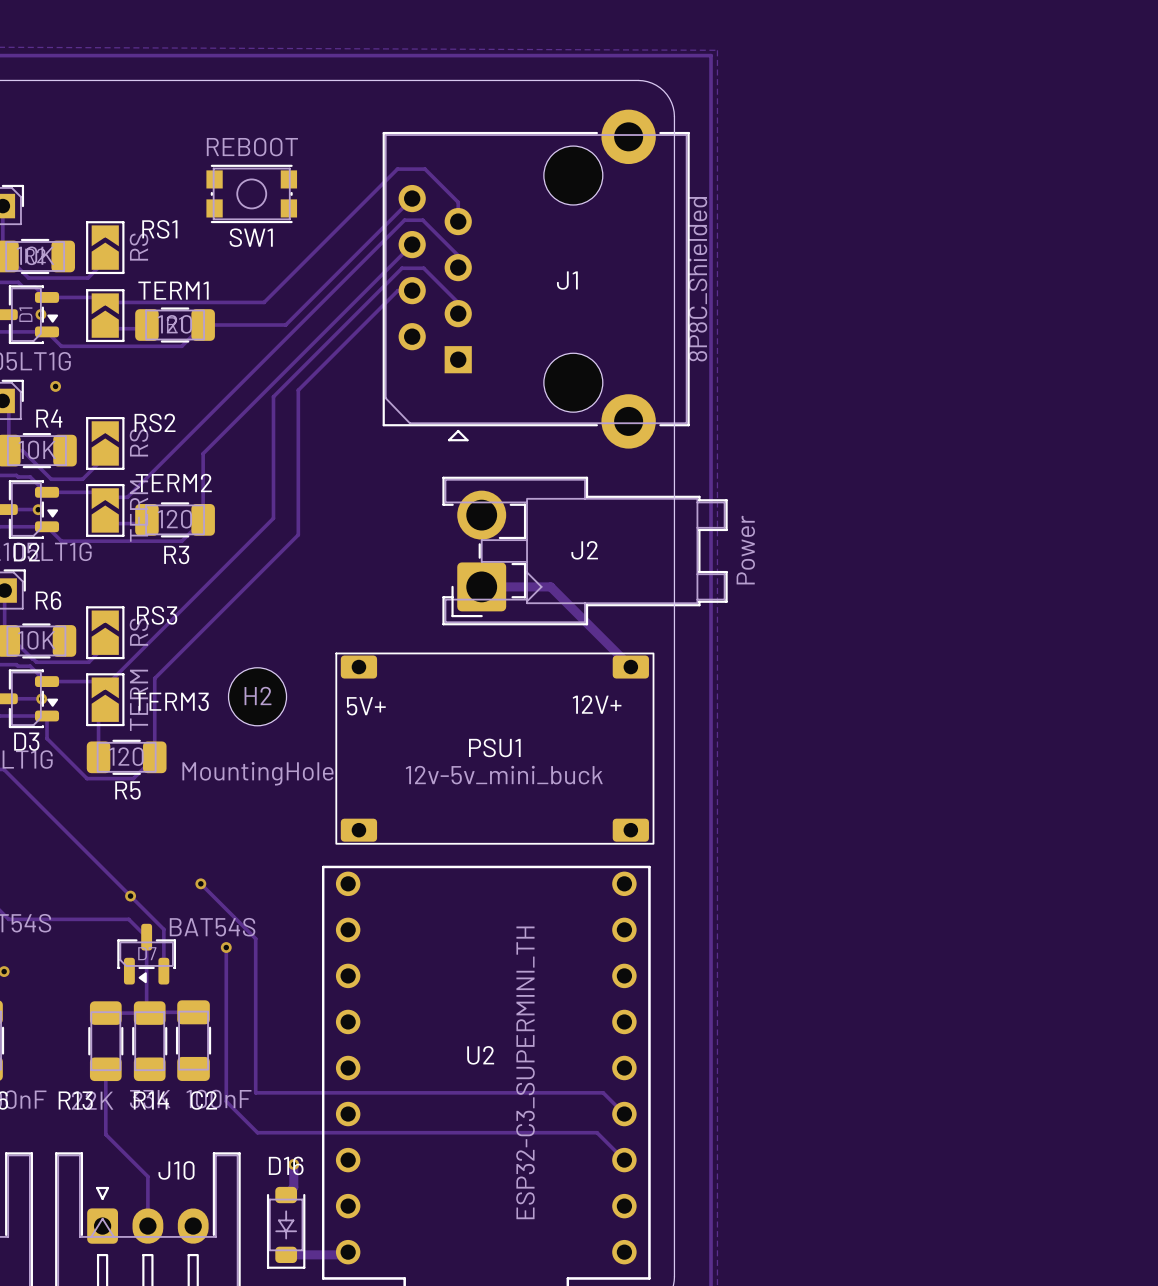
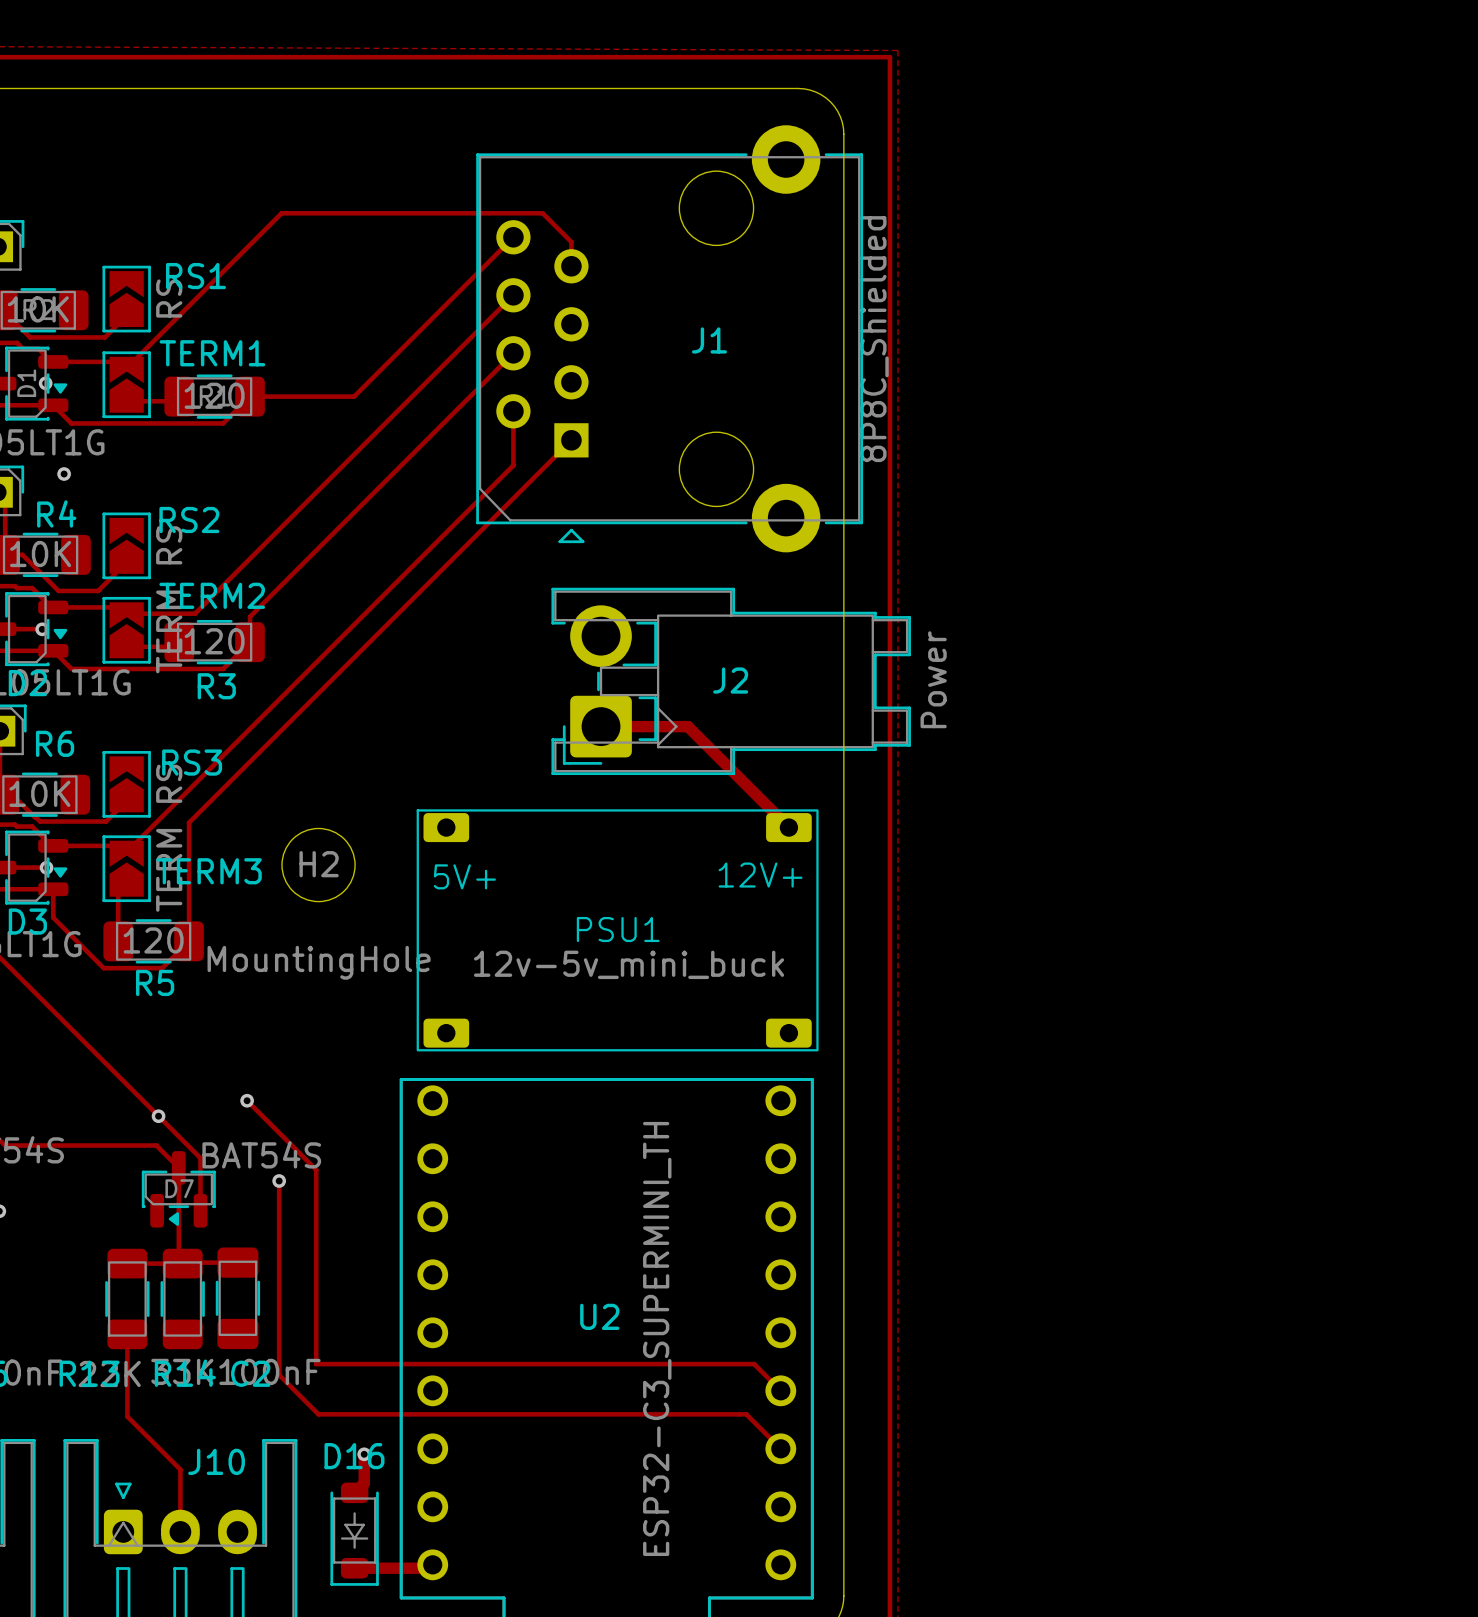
track: (435, 179) (424, 169) (397, 169) (264, 302) (105, 302) -> (542, 213) (281, 213) (126, 368)
SW1: REBOOT (251, 193) -> none
track: (458, 267) (458, 255) (422, 220) (404, 220) (127, 497) -> none
track: (412, 290) (397, 290) (298, 390) (298, 534) (154, 678) -> (571, 440) (189, 822) (189, 841)
track: none -> (513, 353) (250, 616)
track: (458, 313) (458, 302) (423, 268) (402, 268) (273, 396) (273, 518) -> (513, 411) (513, 465) (338, 640)
track: (203, 453) (203, 499) -> (250, 558) (195, 613) (154, 613)

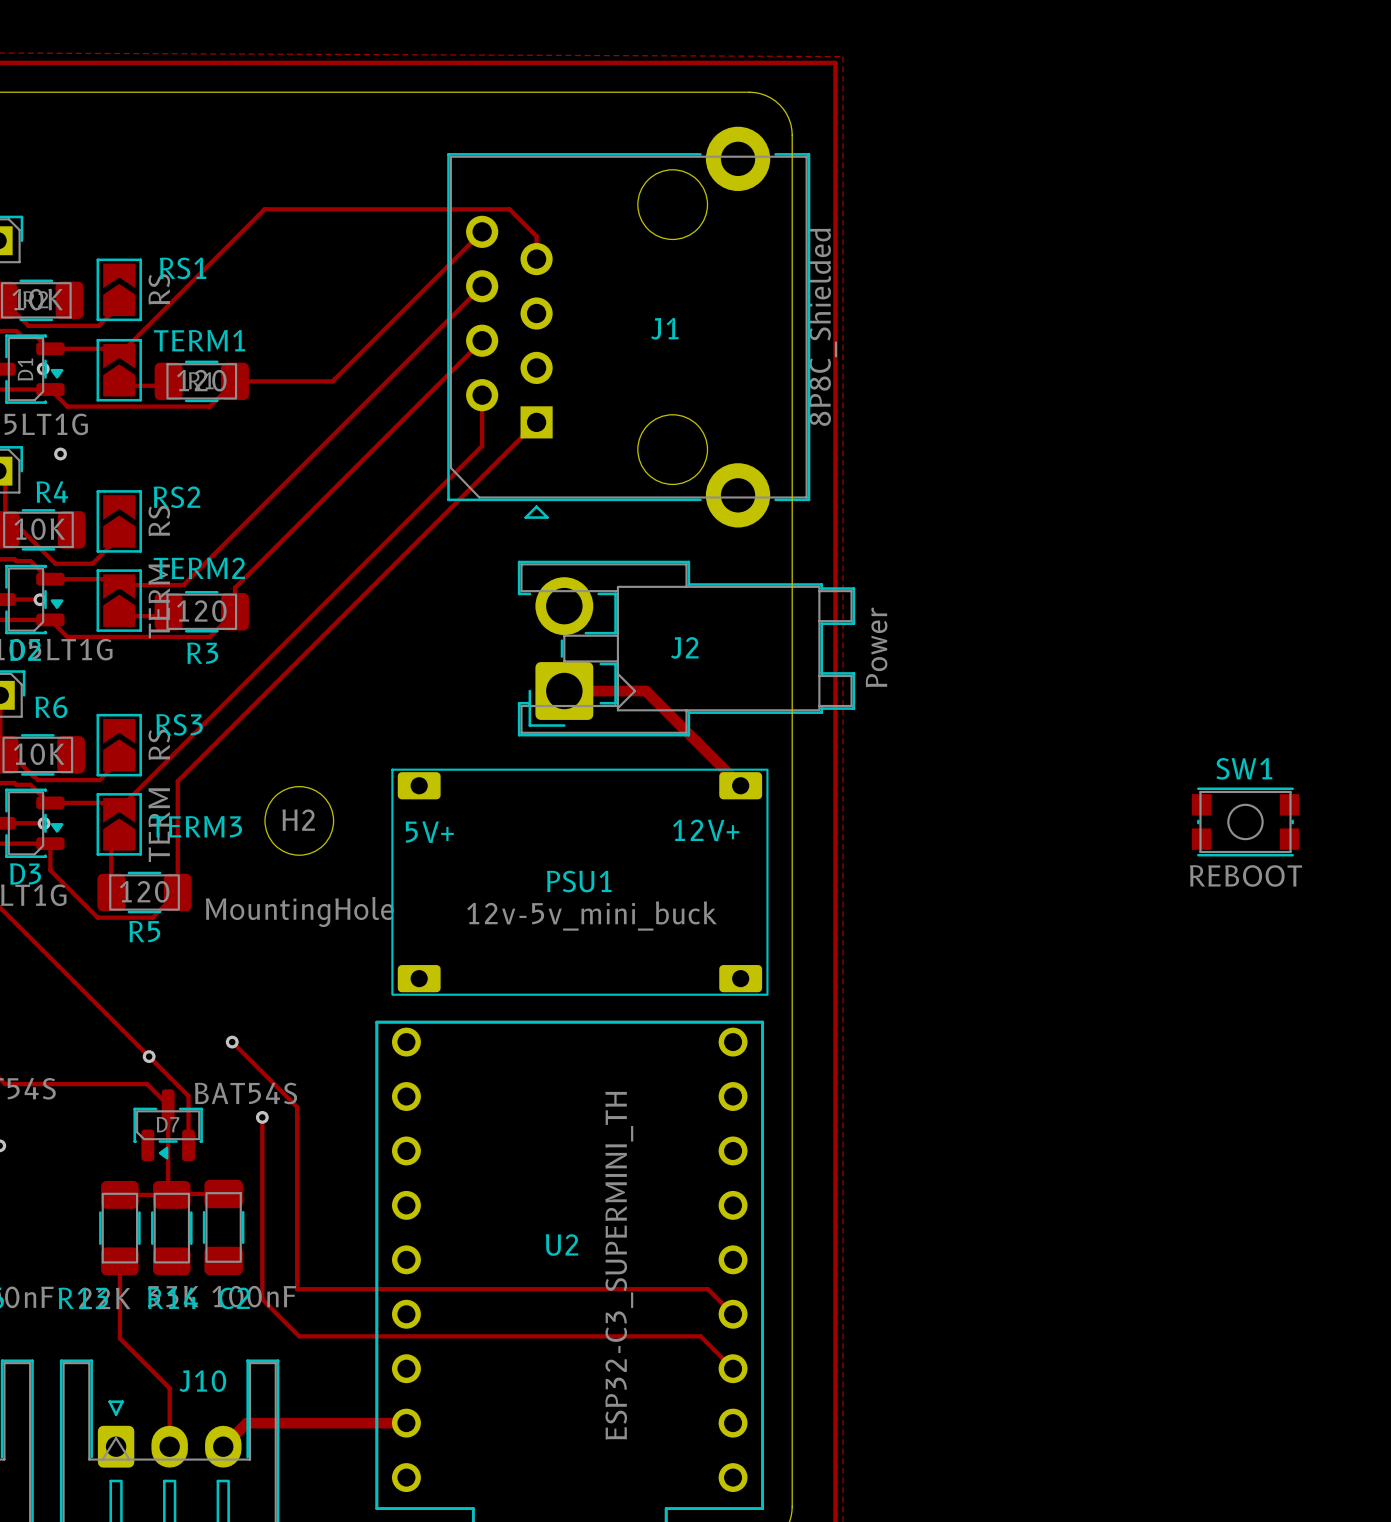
SW1: none -> REBOOT (1245, 821)
track: (364, 1454) (364, 1483) (354, 1492) -> none
via: (364, 1454) -> none
track: none -> (406, 1423) (246, 1423) (223, 1446)
D16: (354, 1534) -> none
track: (432, 1564) (429, 1568) (354, 1568) -> none

